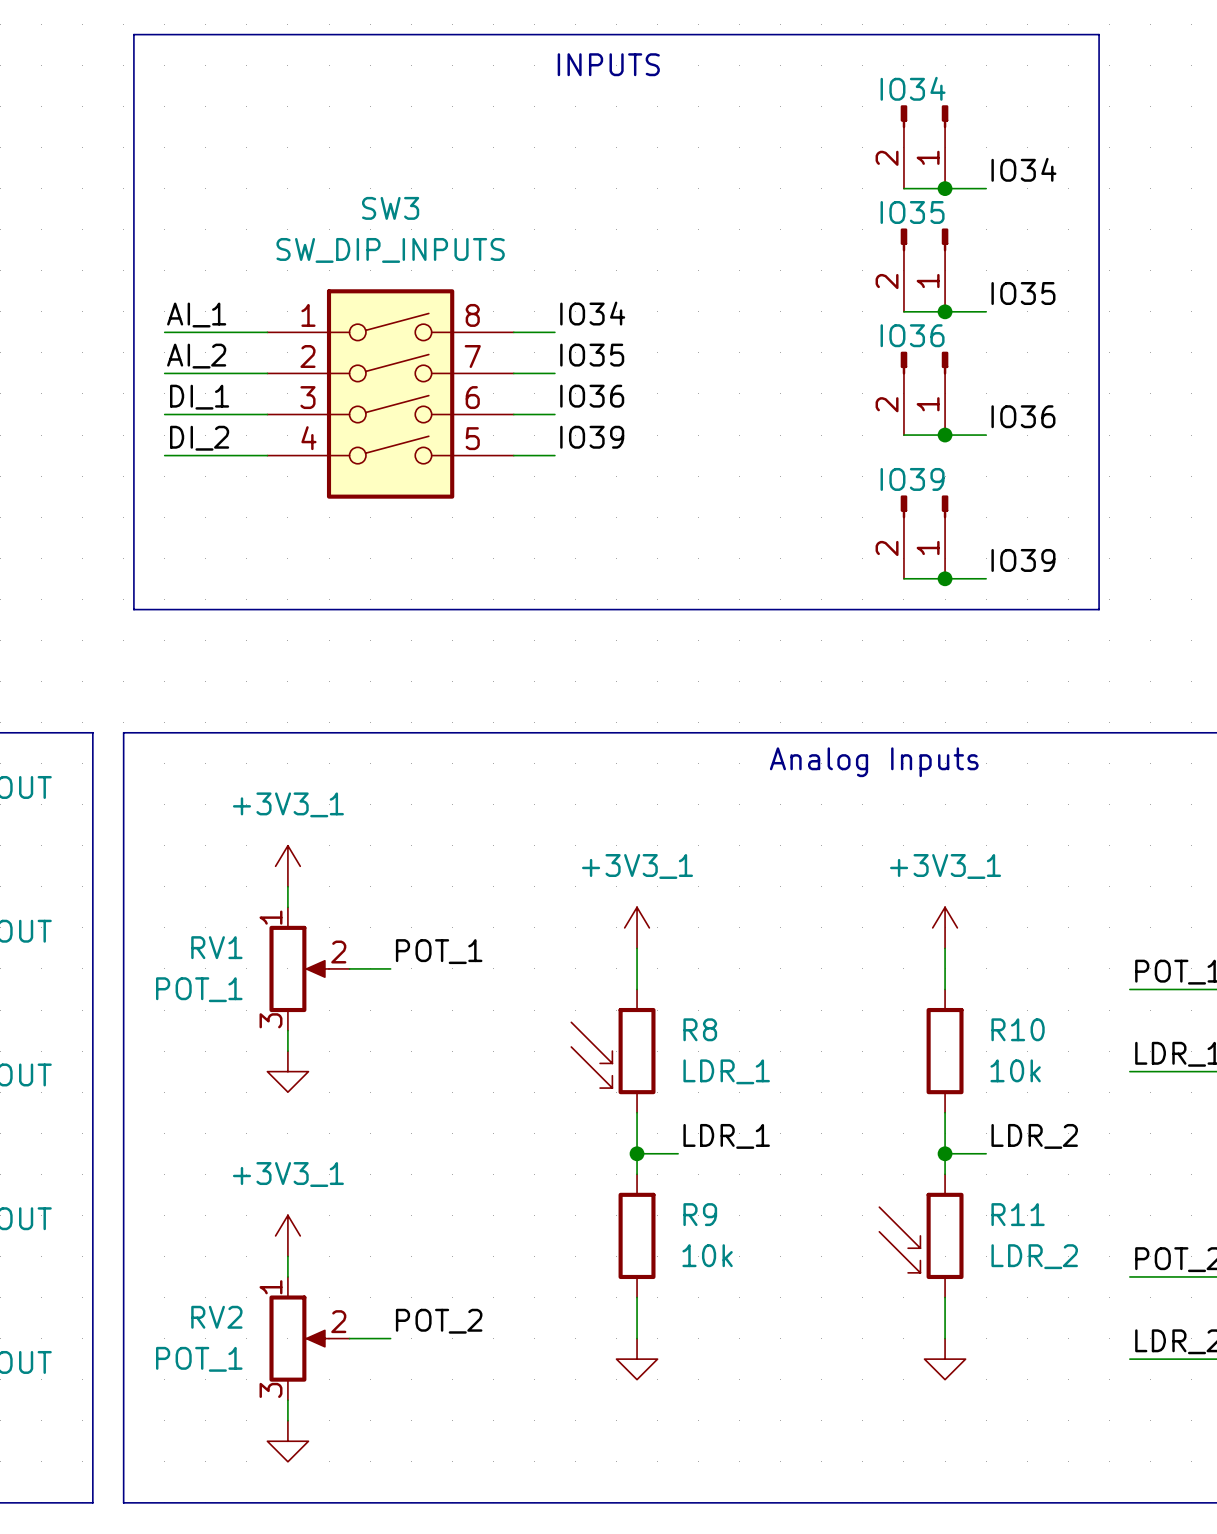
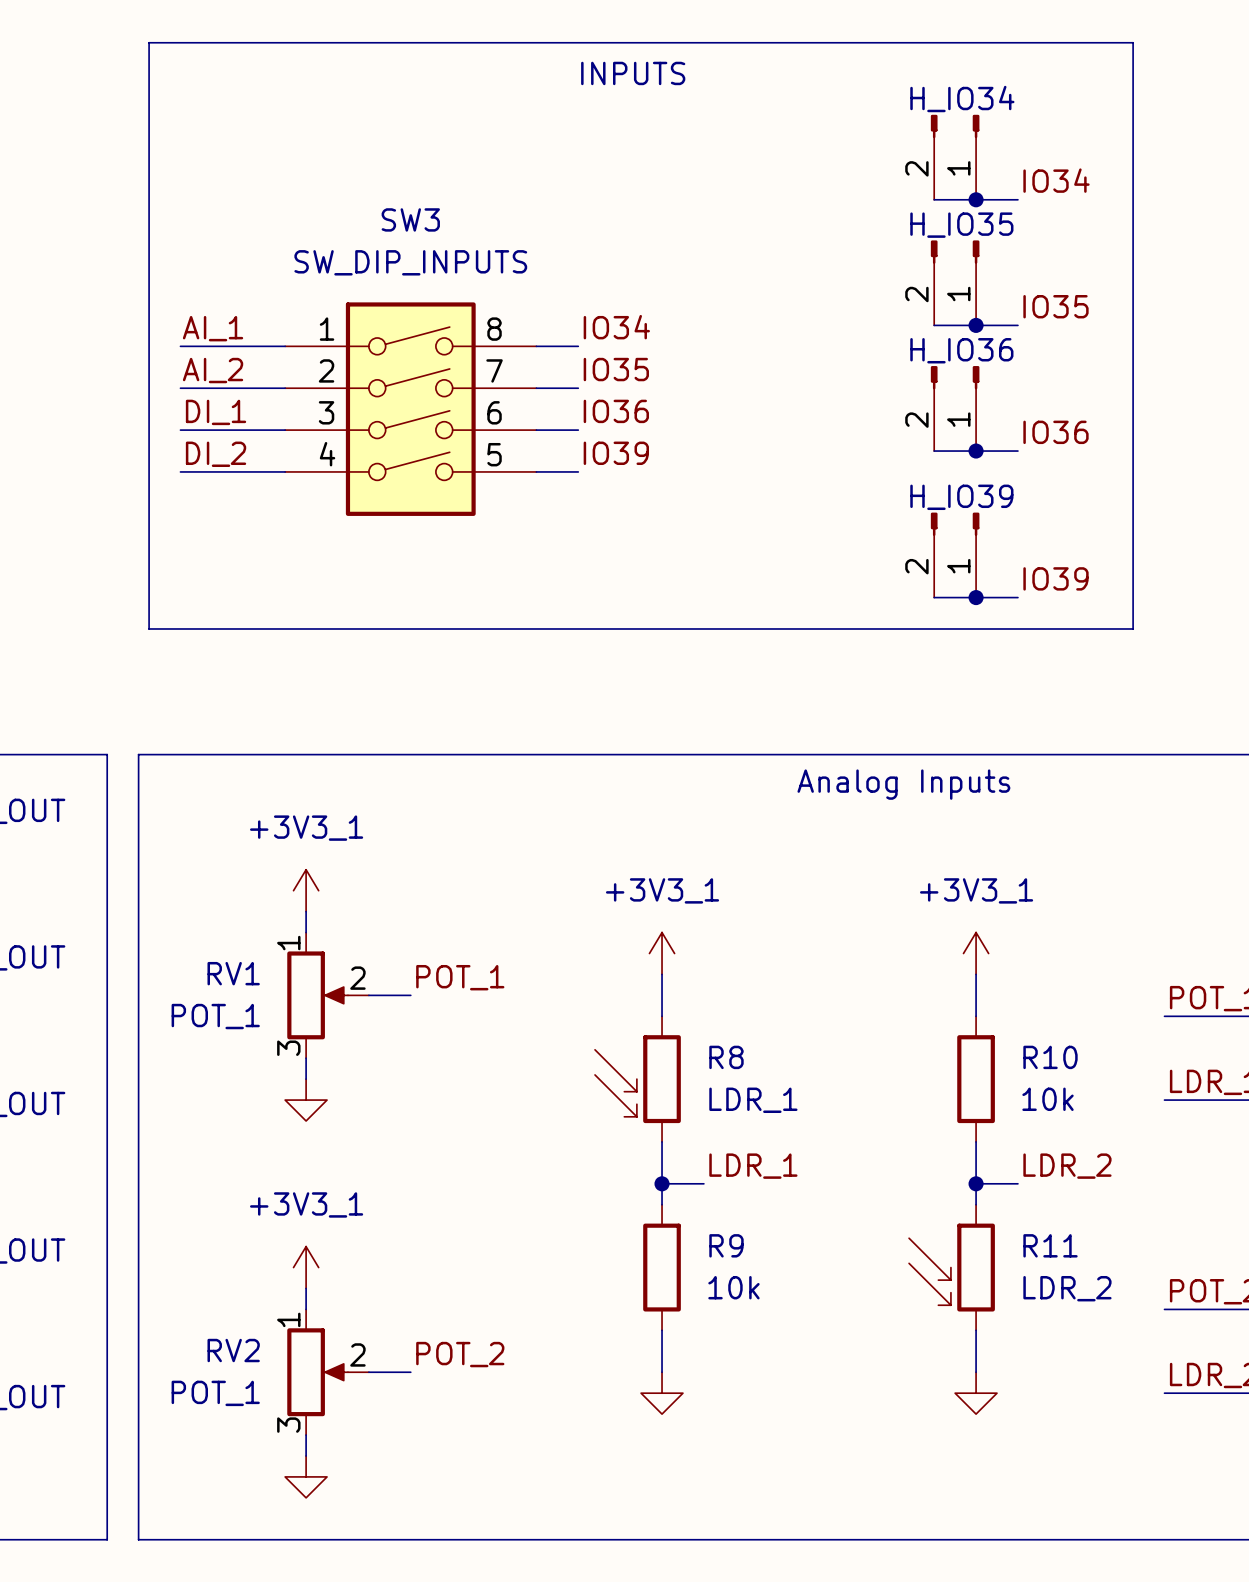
part value: IO34 (913, 88) -> H_IO34 (962, 99)
part value: IO35 (912, 212) -> H_IO35 (961, 225)
part value: IO36 (912, 335) -> H_IO36 (961, 350)
part value: IO39 (912, 479) -> H_IO39 (961, 497)

